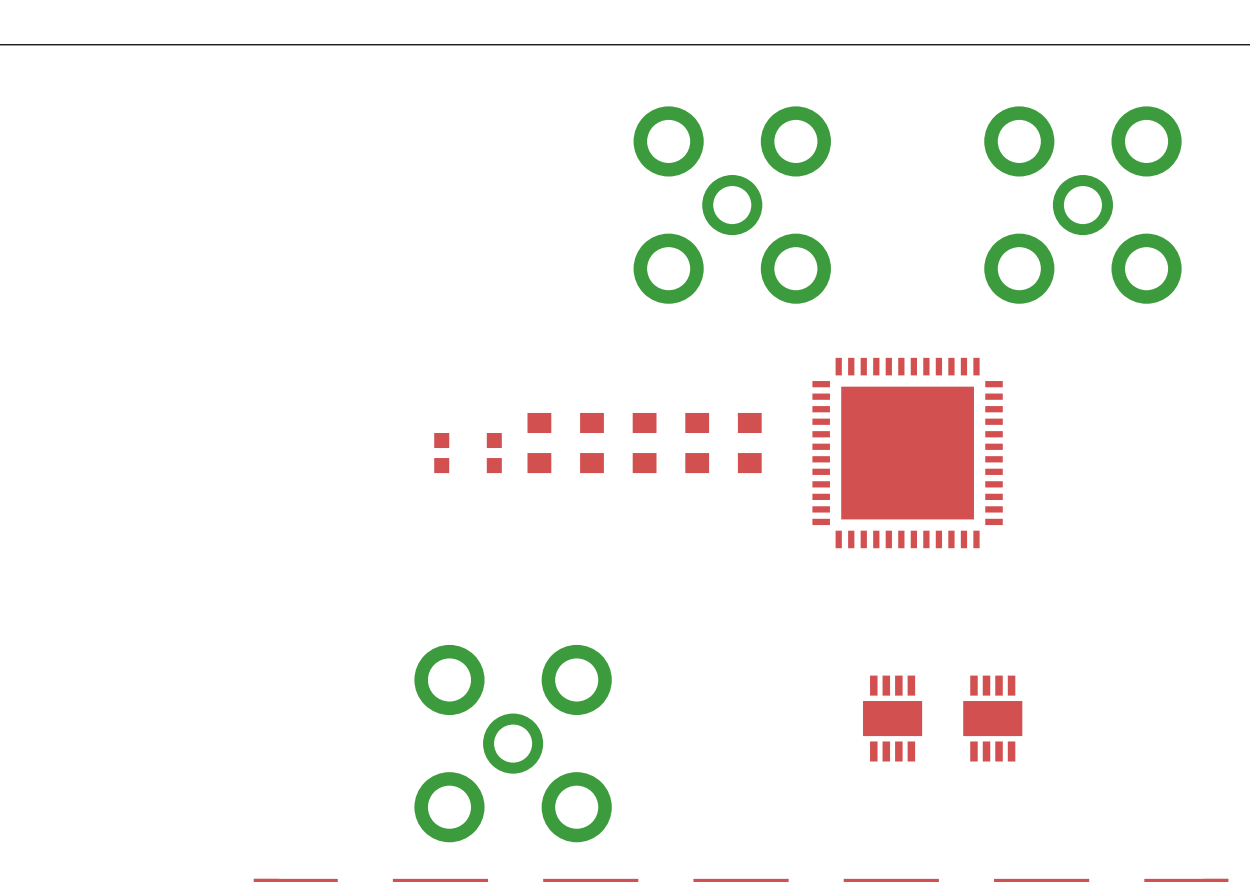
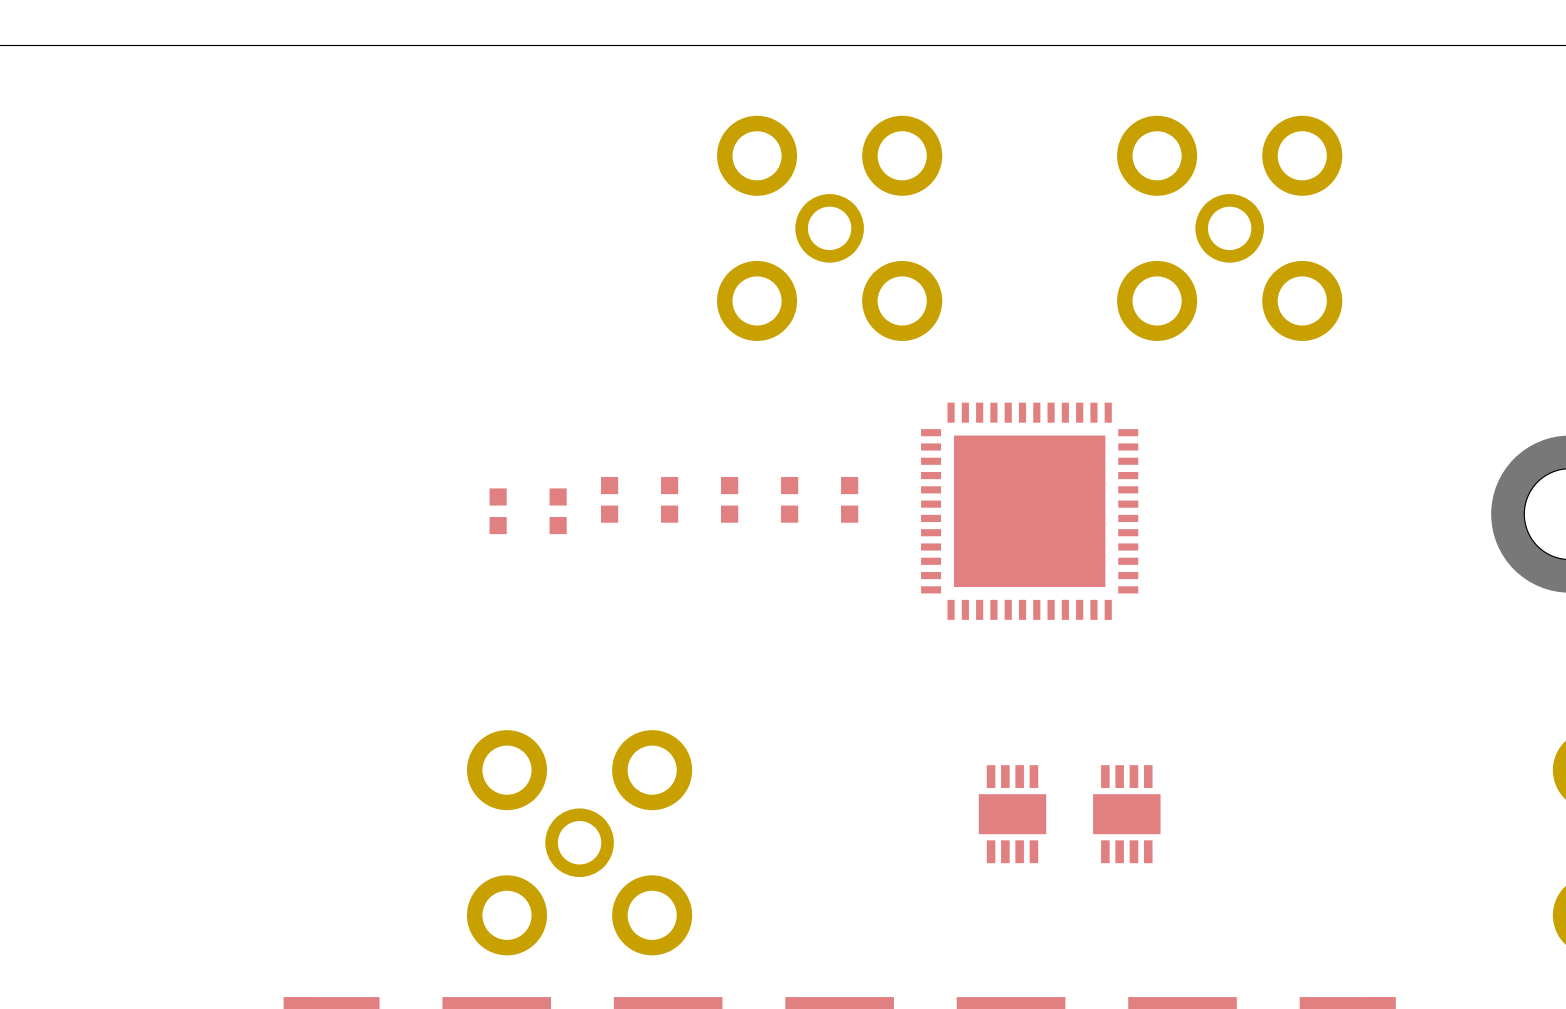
part footprint: [527, 412, 552, 474] -> [601, 476, 619, 523]
part footprint: [580, 412, 604, 474] -> [661, 476, 679, 523]
part footprint: [632, 412, 657, 474] -> [721, 476, 739, 523]
part footprint: [685, 412, 710, 474] -> [781, 476, 799, 523]
part footprint: [737, 412, 762, 474] -> [841, 476, 859, 523]

